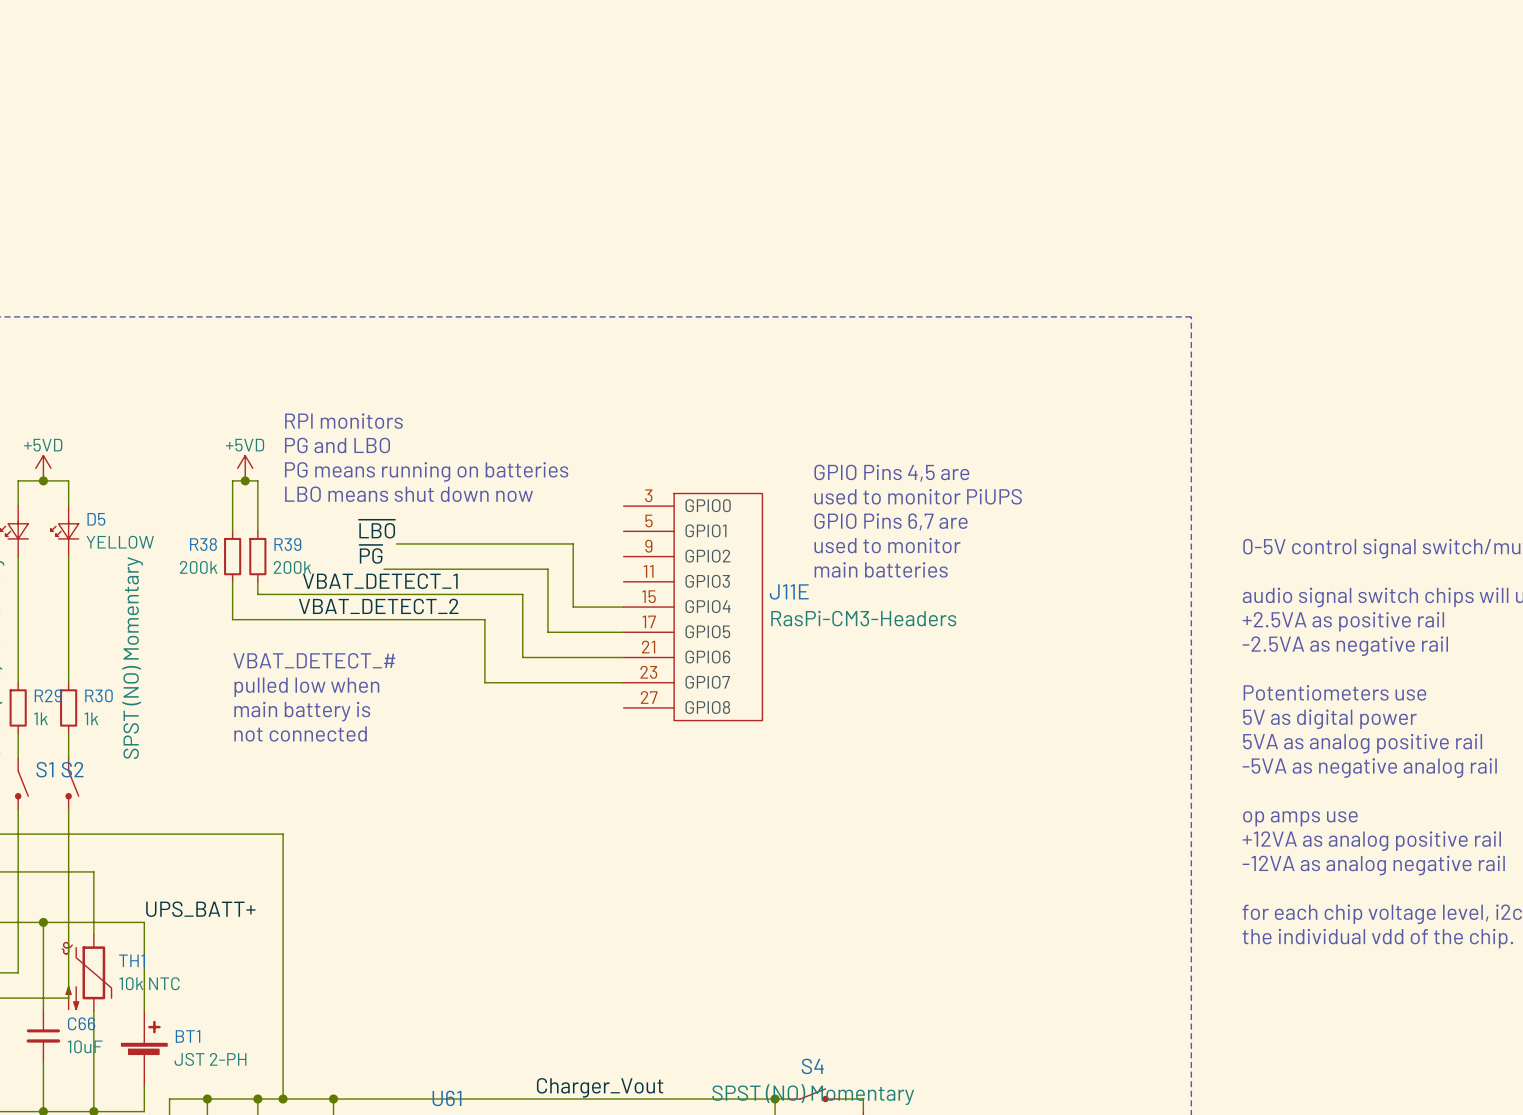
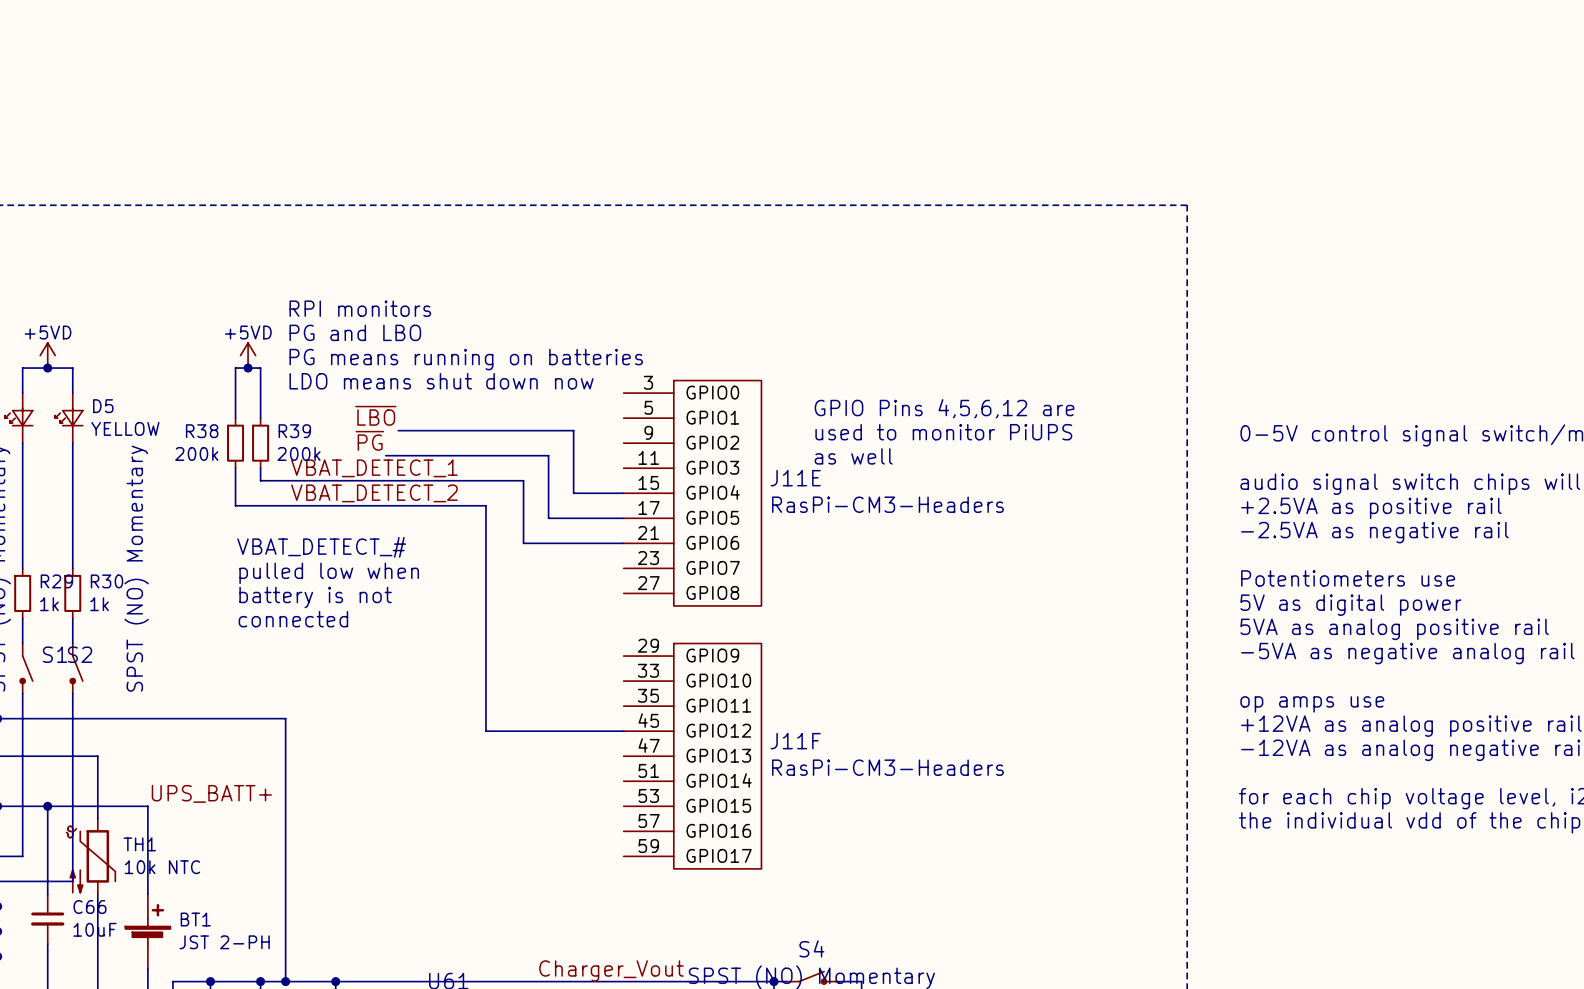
text: GPIO Pins 4,5 are (891, 473) -> none
text: LBO means shut down now (409, 494) -> LDO means shut down now (441, 381)
text: used to monitor PiUPS (918, 496) -> none
text: GPIO Pins 6,7 are (890, 521) -> GPIO Pins 4,5,6,12 are (944, 408)
text: used to monitor (887, 545) -> used to monitor PiUPS (943, 432)
text: main batteries (881, 569) -> as well (853, 456)
wire: (484, 682) (623, 682) -> (485, 568) (485, 731) (623, 731)
text: main battery is (302, 711) -> battery is not (315, 597)
text: not connected (300, 734) -> connected (293, 619)
J11F: none -> RasPi-CM3-Headers (692, 756)

